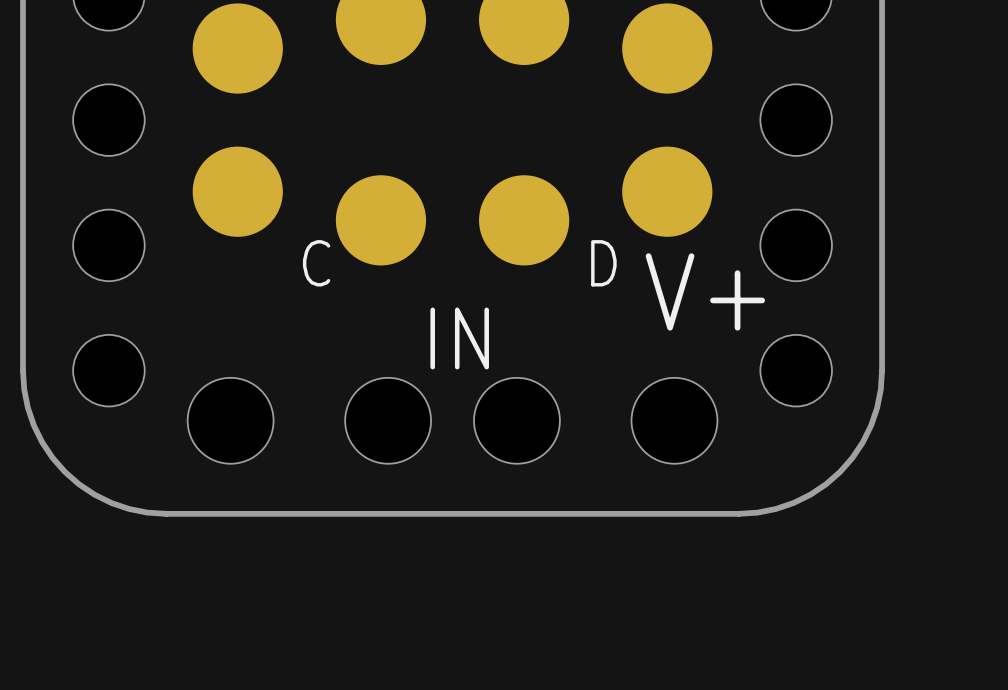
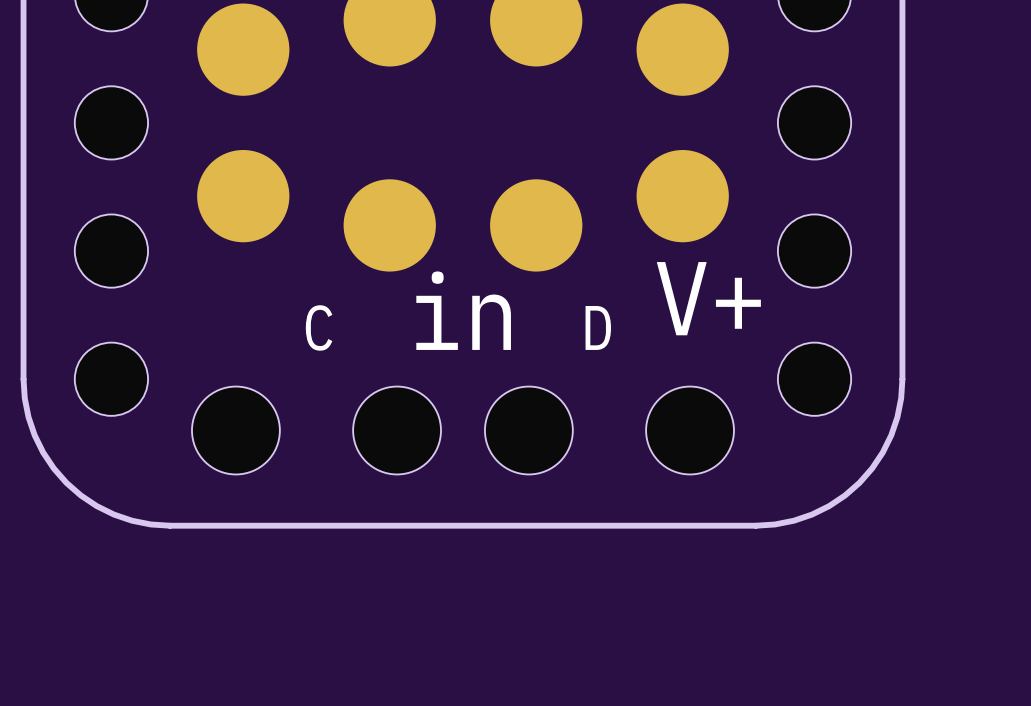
text position: C (316, 263) -> C (319, 327)
text position: D (603, 263) -> D (598, 327)
text: IN (459, 338) -> in (463, 310)

